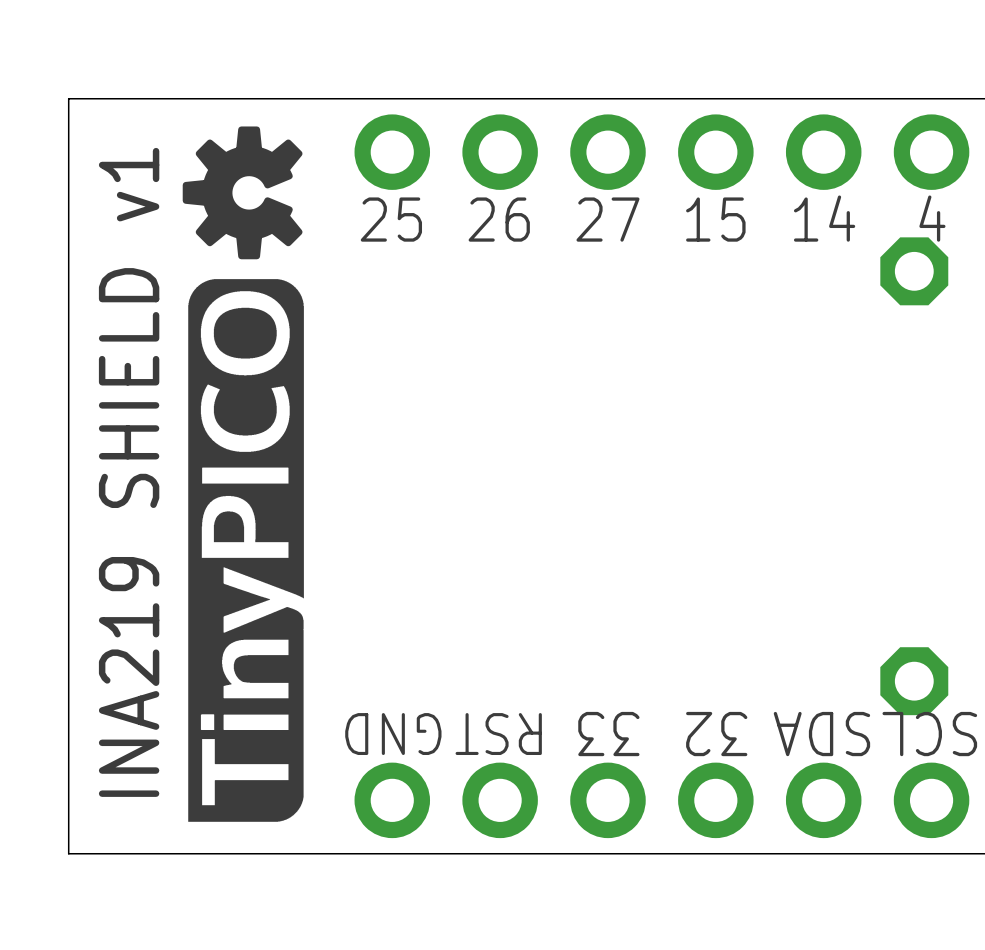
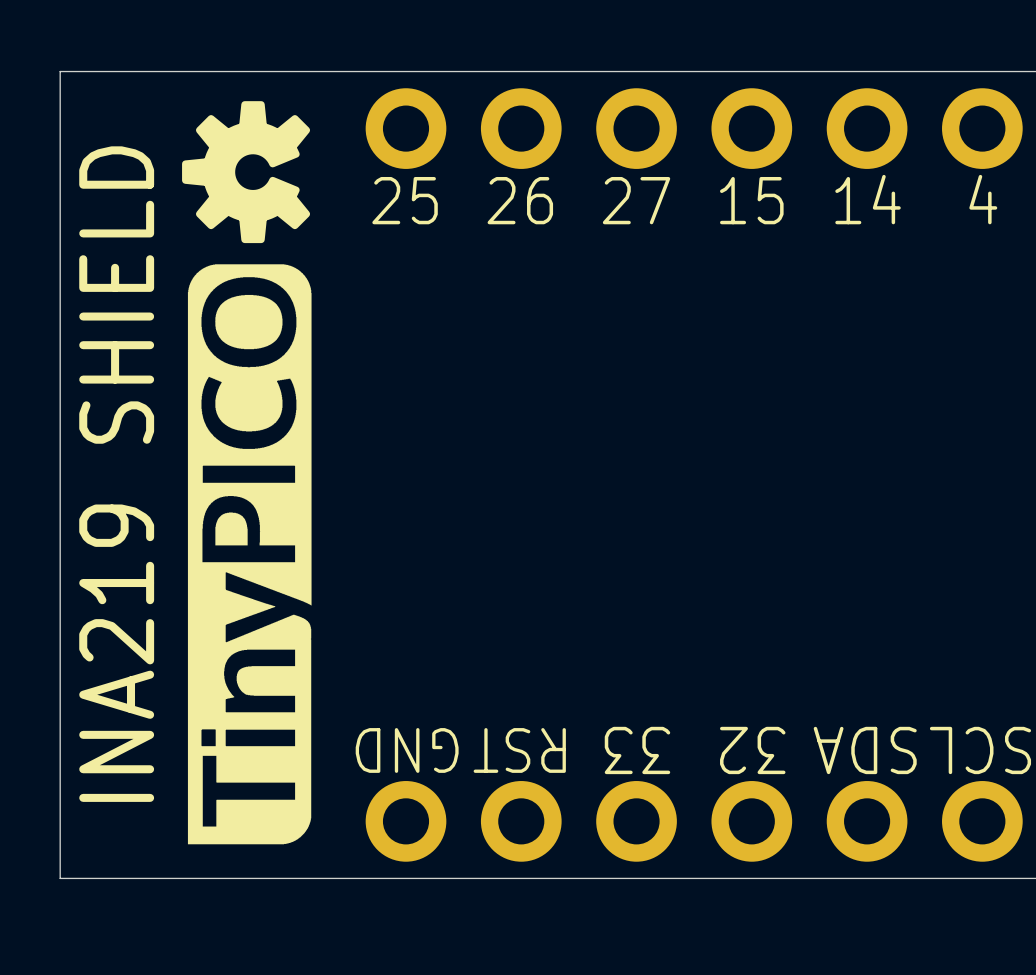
part: (914, 271) -> none
text: INA219 SHIELD v1 (129, 472) -> INA219 SHIELD (116, 474)
part: (914, 681) -> none

